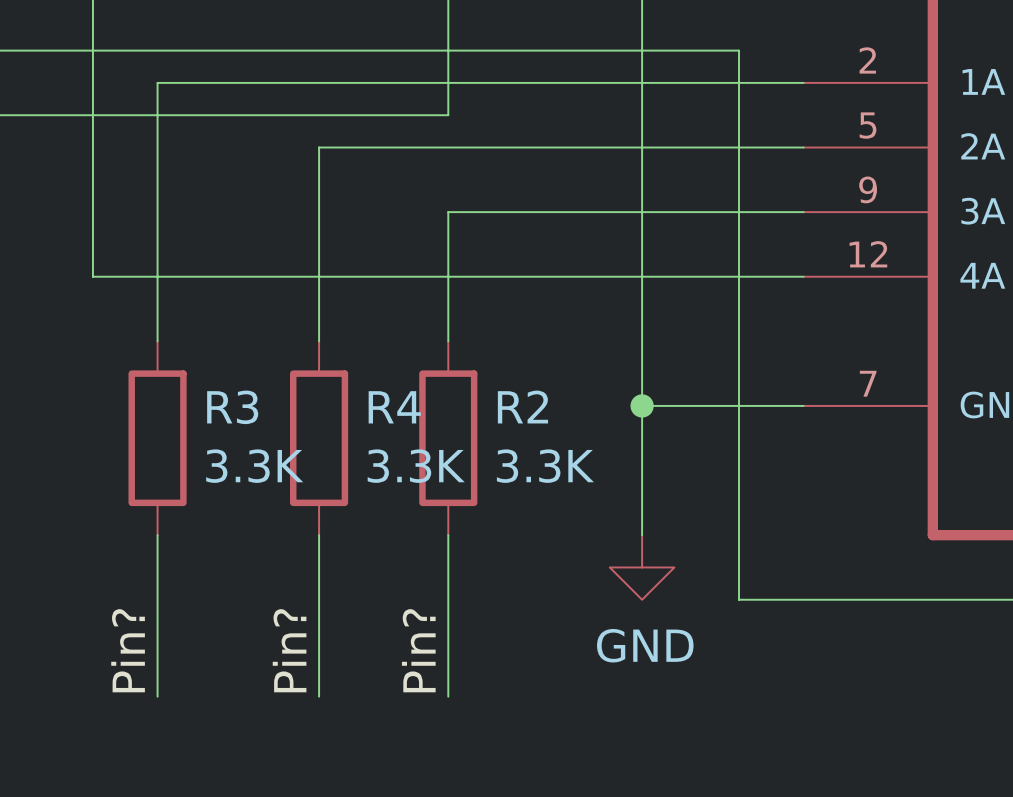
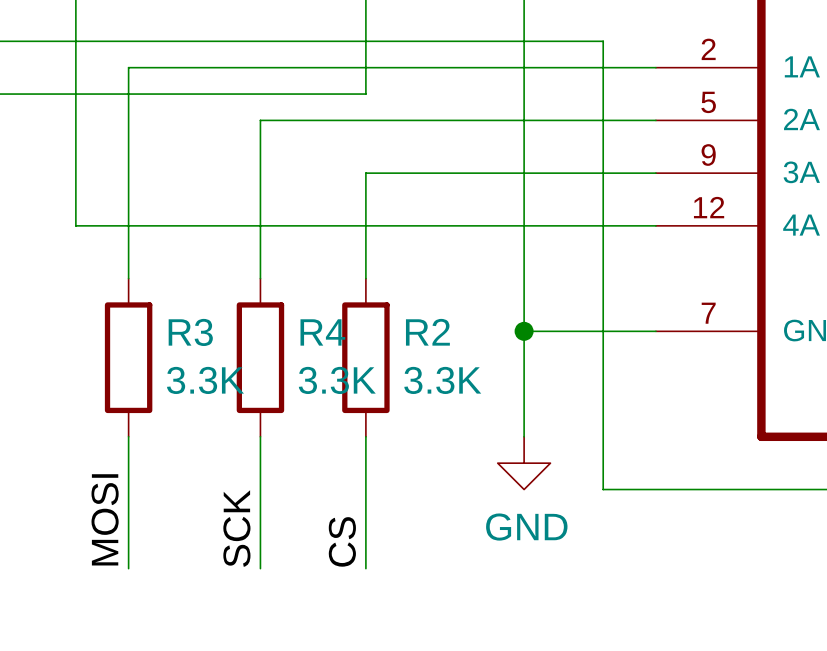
label: Pin? (128, 650) -> MOSI (105, 519)
label: Pin? (289, 650) -> SCK (236, 528)
label: Pin? (418, 650) -> CS (342, 541)

